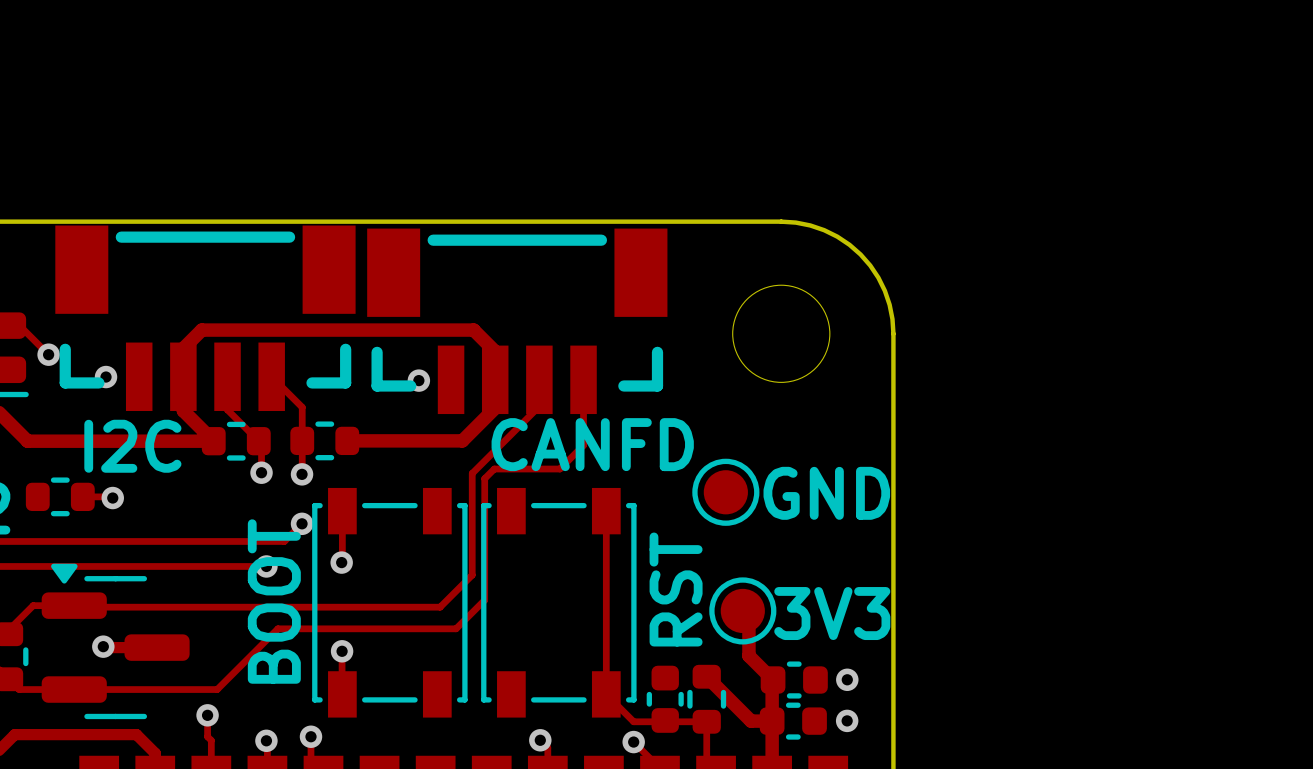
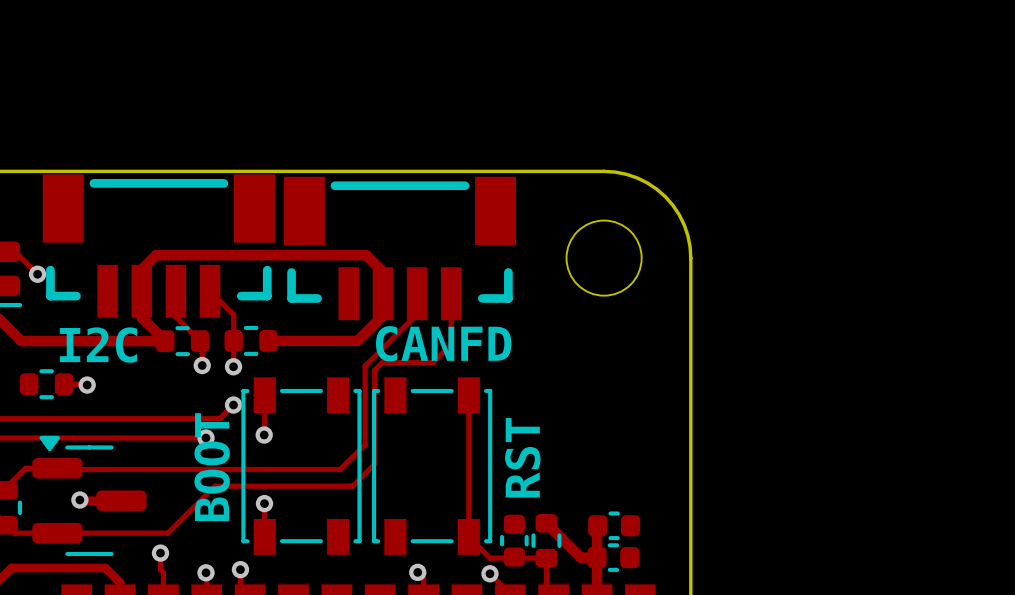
via: (106, 377) -> none
via: (418, 380) -> none
part: (725, 492) -> none
text: GND (826, 493) -> none
track: (742, 610) (748, 617) (748, 655) (773, 680) -> none
part: (742, 610) -> none
text: 3V3 (832, 613) -> none
via: (847, 679) -> none
via: (847, 720) -> none

